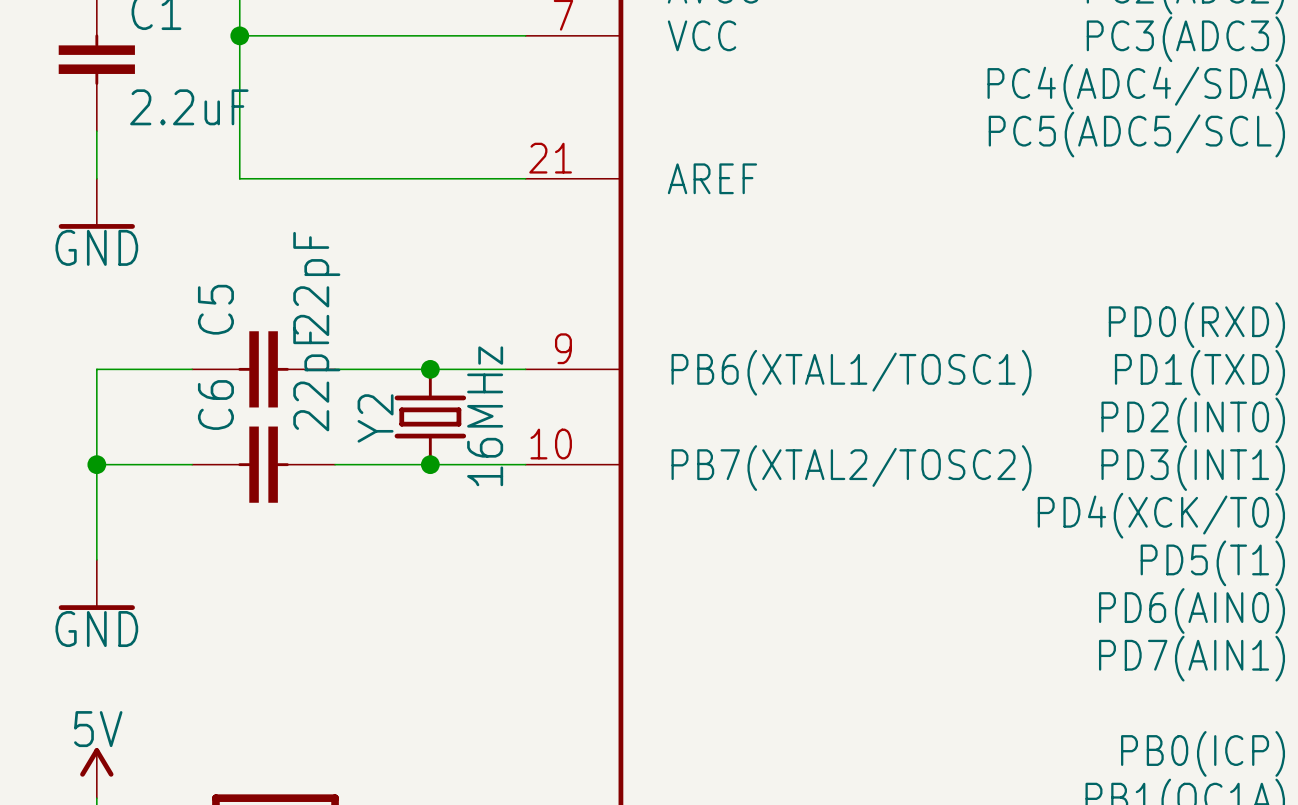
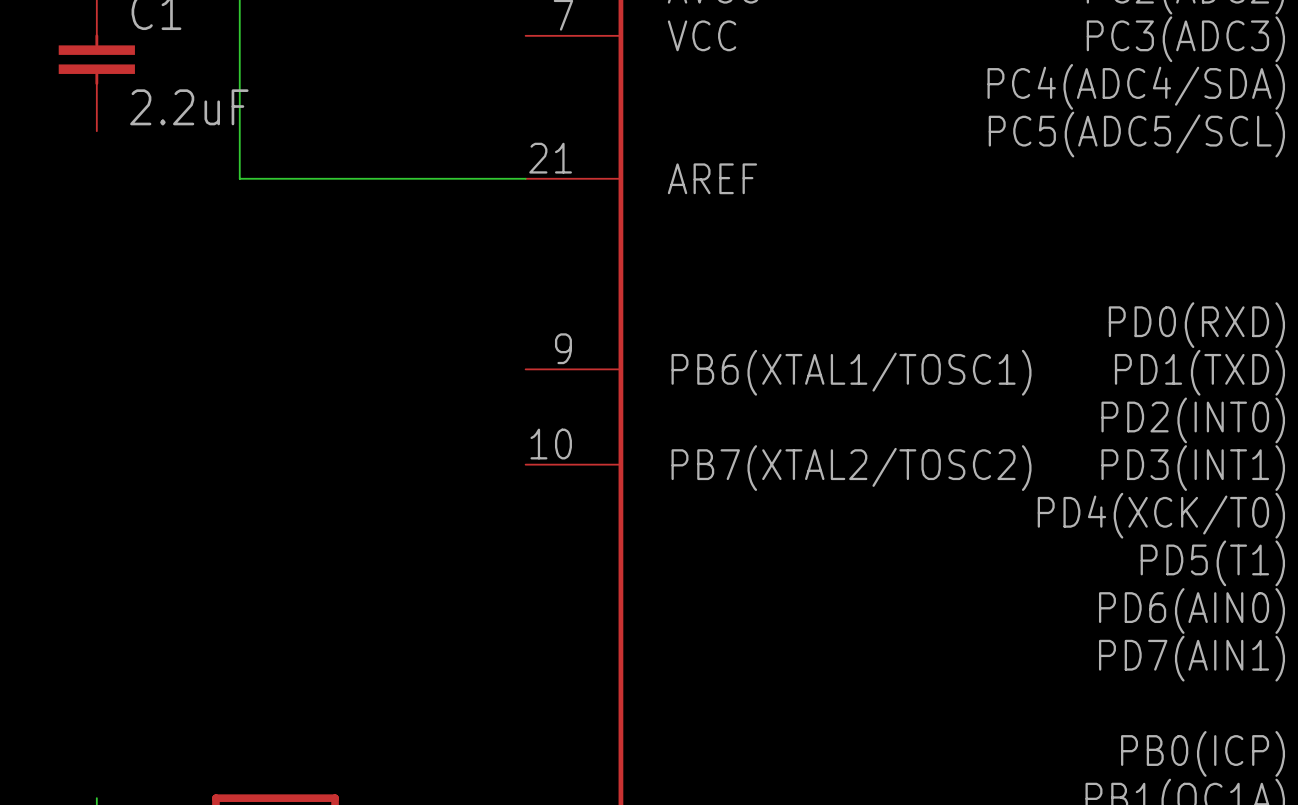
wire: (239, 35) (525, 35) -> none
junction: (239, 35) -> none
wire: (96, 131) (96, 178) -> none
power symbol: GND (96, 203) -> none
wire: (192, 369) (96, 369) (96, 559) -> none
C5: 22pF (263, 369) -> none
wire: (335, 369) (525, 369) -> none
junction: (430, 369) -> none
Y2: 16MHz (430, 417) -> none
wire: (96, 464) (192, 464) -> none
junction: (96, 464) -> none
C6: 22pF (263, 464) -> none
wire: (335, 464) (525, 464) -> none
junction: (430, 464) -> none
power symbol: GND (96, 584) -> none
power symbol: 5V (96, 773) -> none

